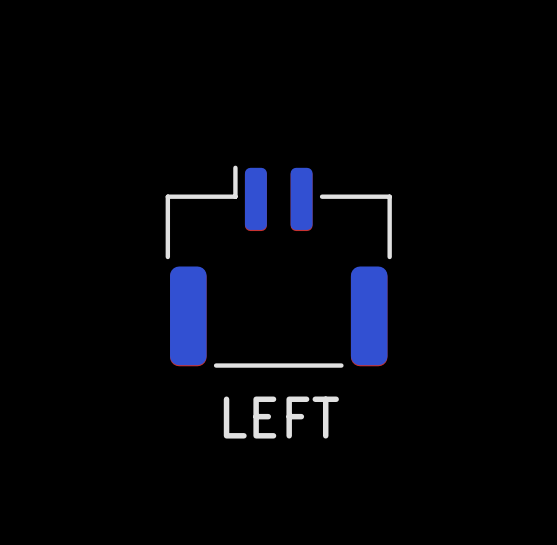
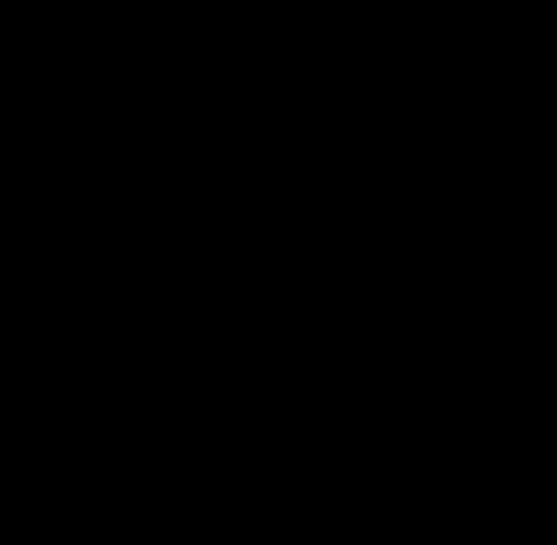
part: (278, 266) -> none

